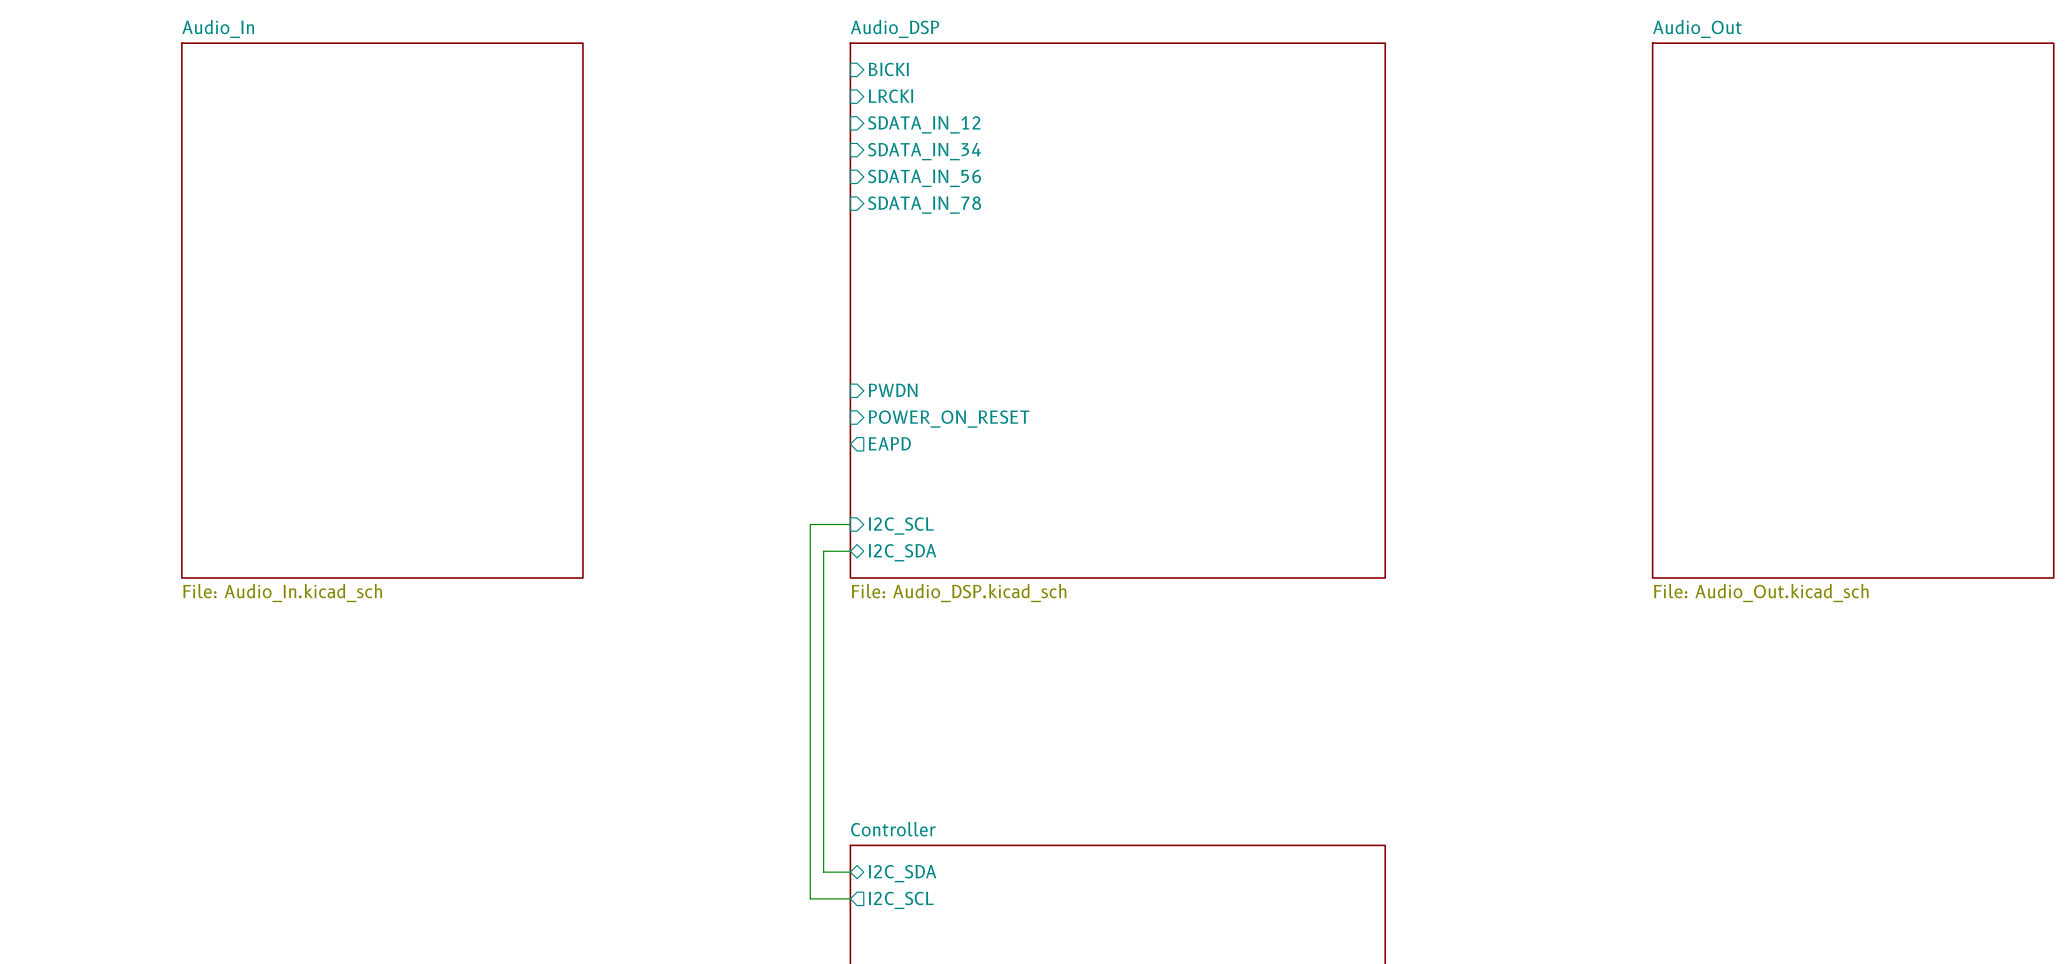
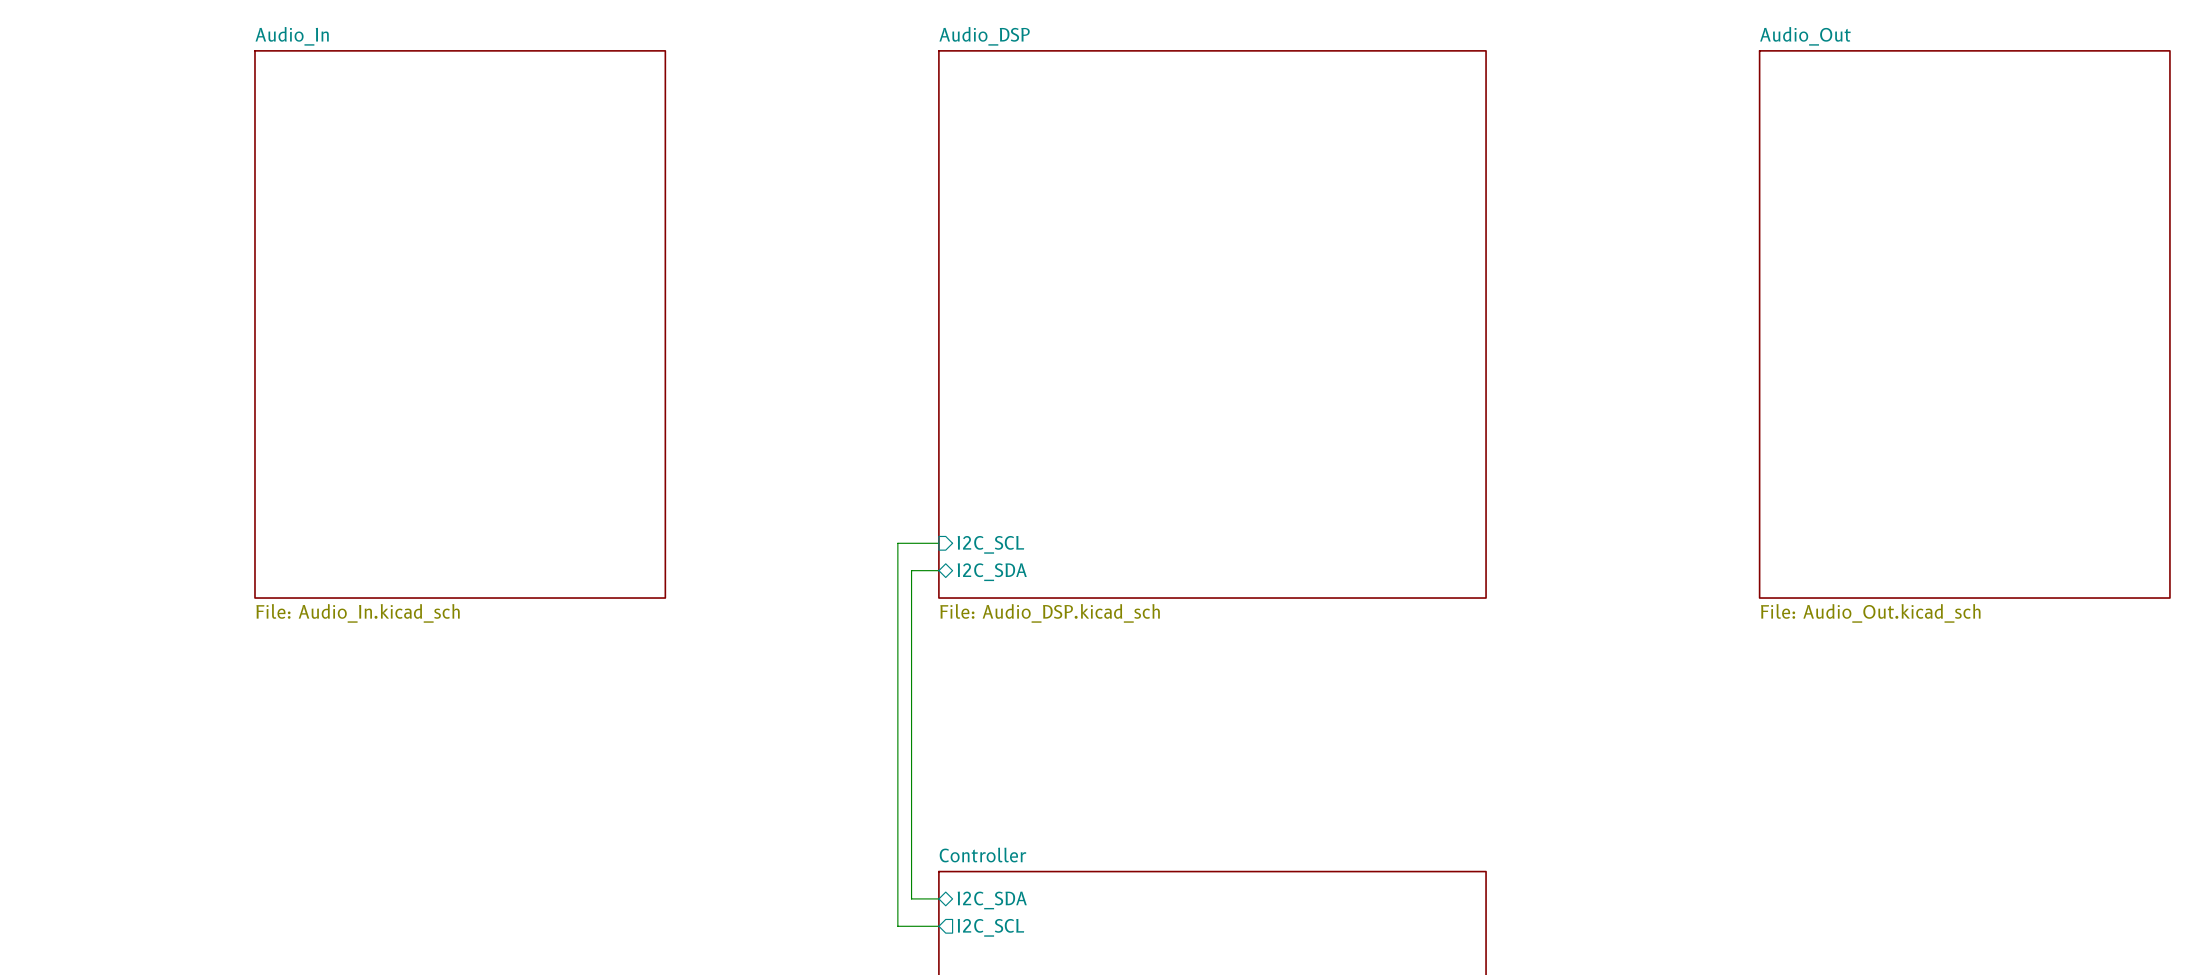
sheet pin: BICKI (888, 69) -> none
sheet pin: LRCKI (890, 96) -> none
sheet pin: SDATA_IN_12 (924, 124) -> none
sheet pin: SDATA_IN_34 (924, 151) -> none
sheet pin: SDATA_IN_56 (924, 178) -> none
sheet pin: SDATA_IN_78 (924, 205) -> none
sheet pin: PWDN (893, 390) -> none
sheet pin: POWER_ON_RESET (949, 419) -> none
sheet pin: EAPD (889, 443) -> none

